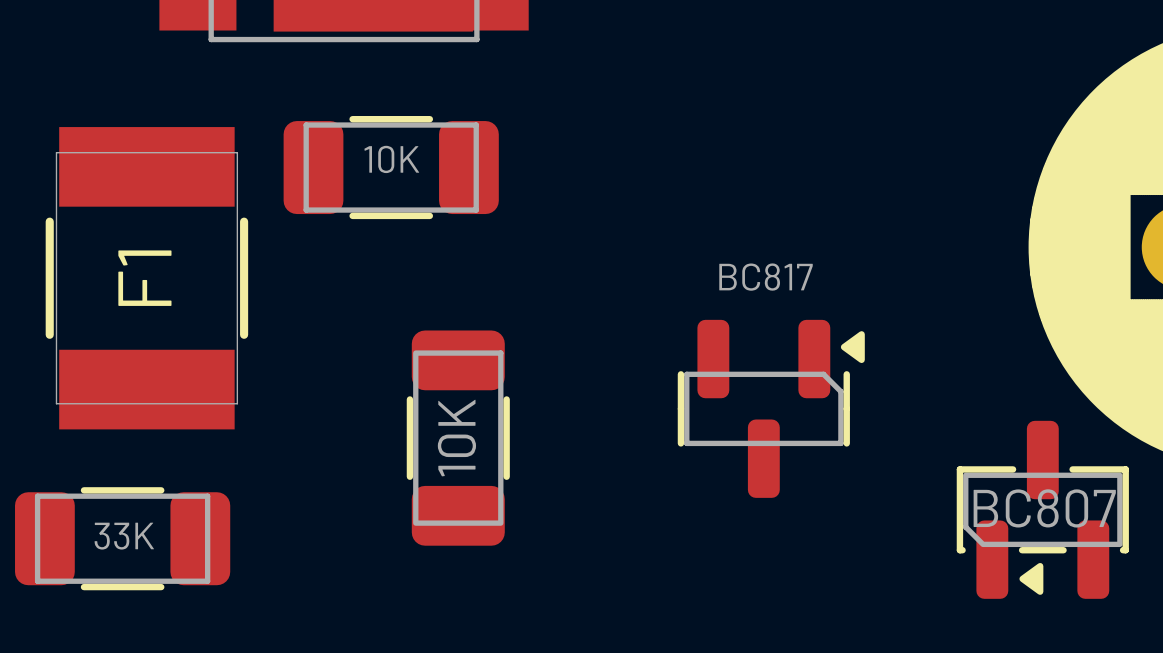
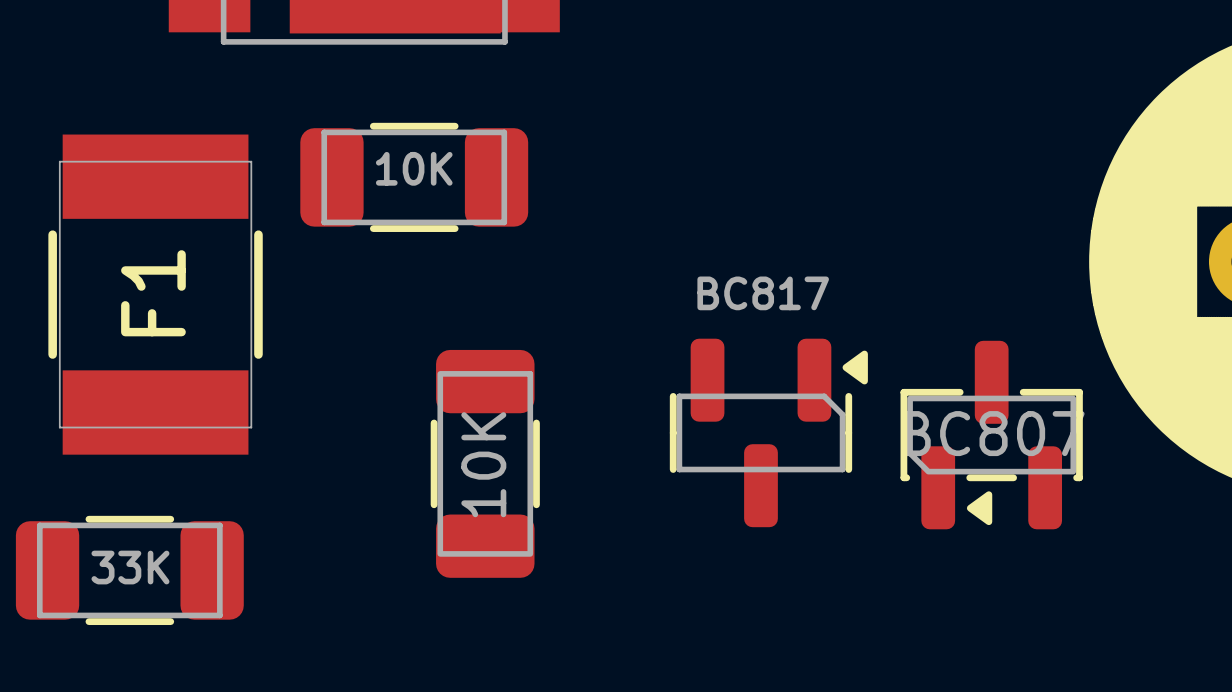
part position: (771, 408) -> (768, 432)
part position: (1042, 509) -> (991, 435)

